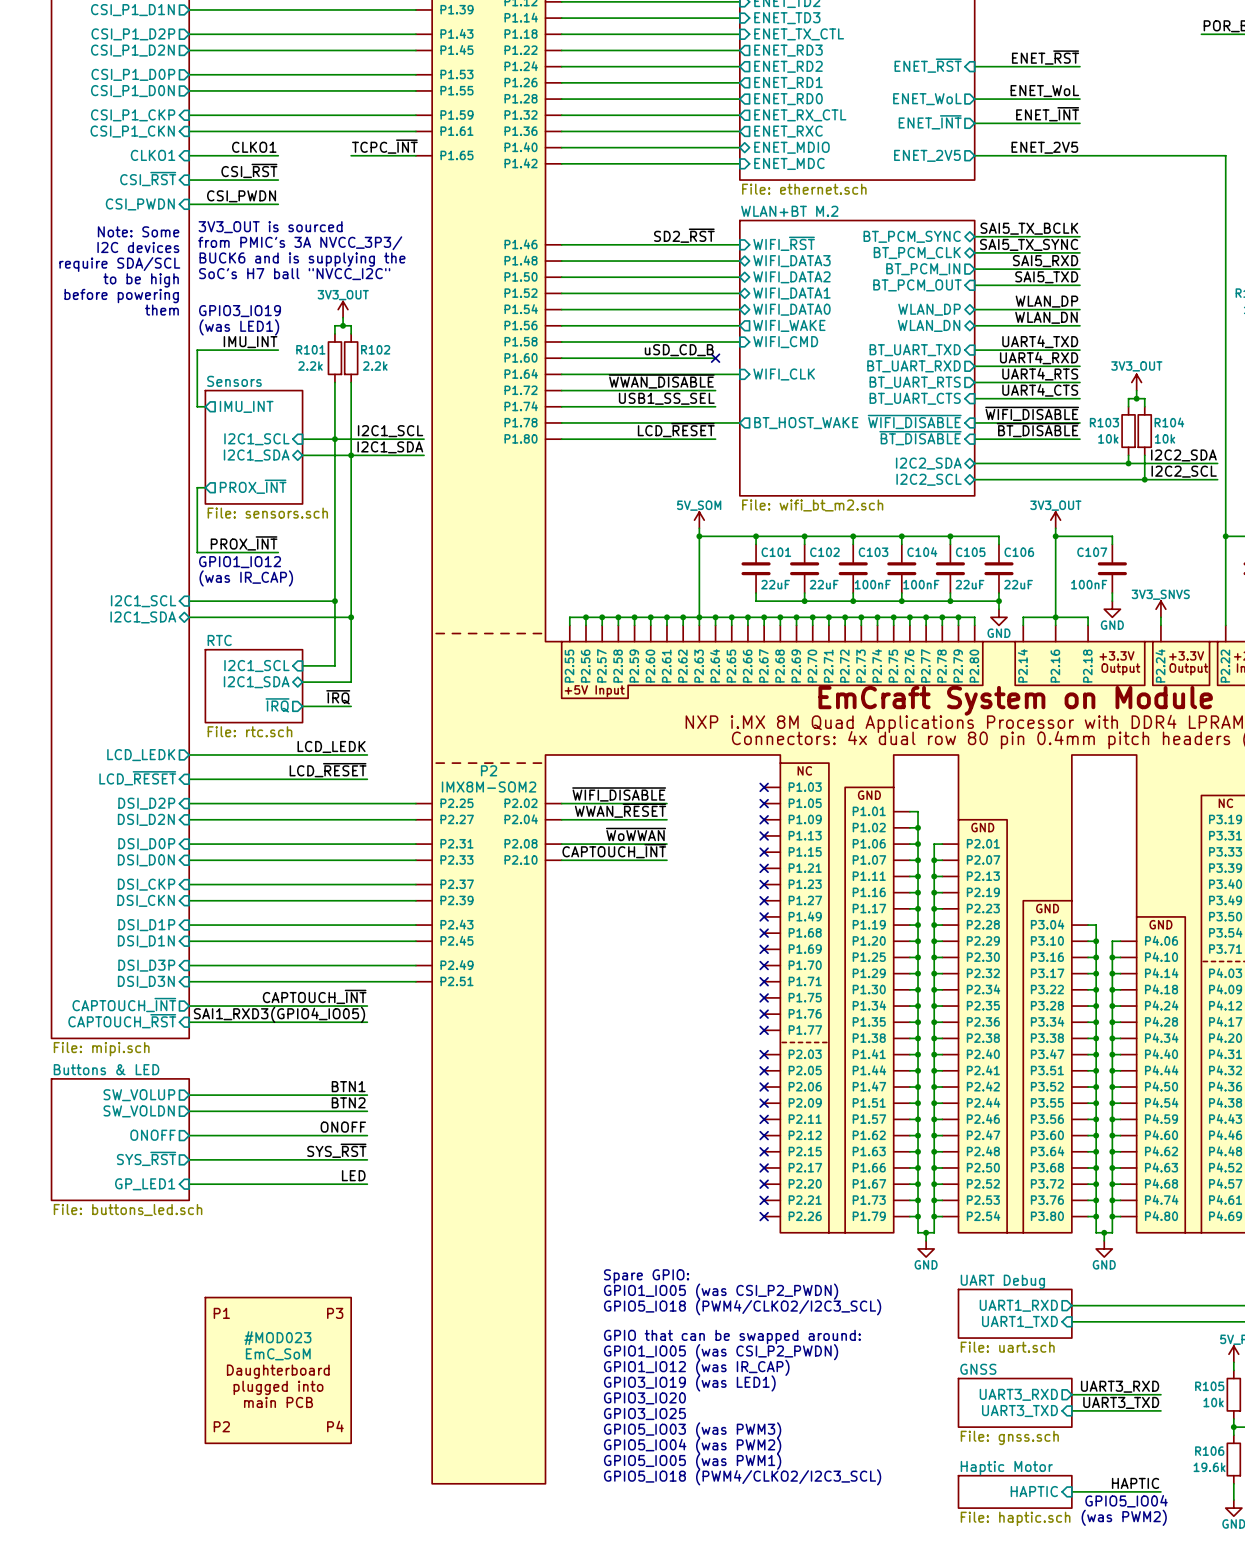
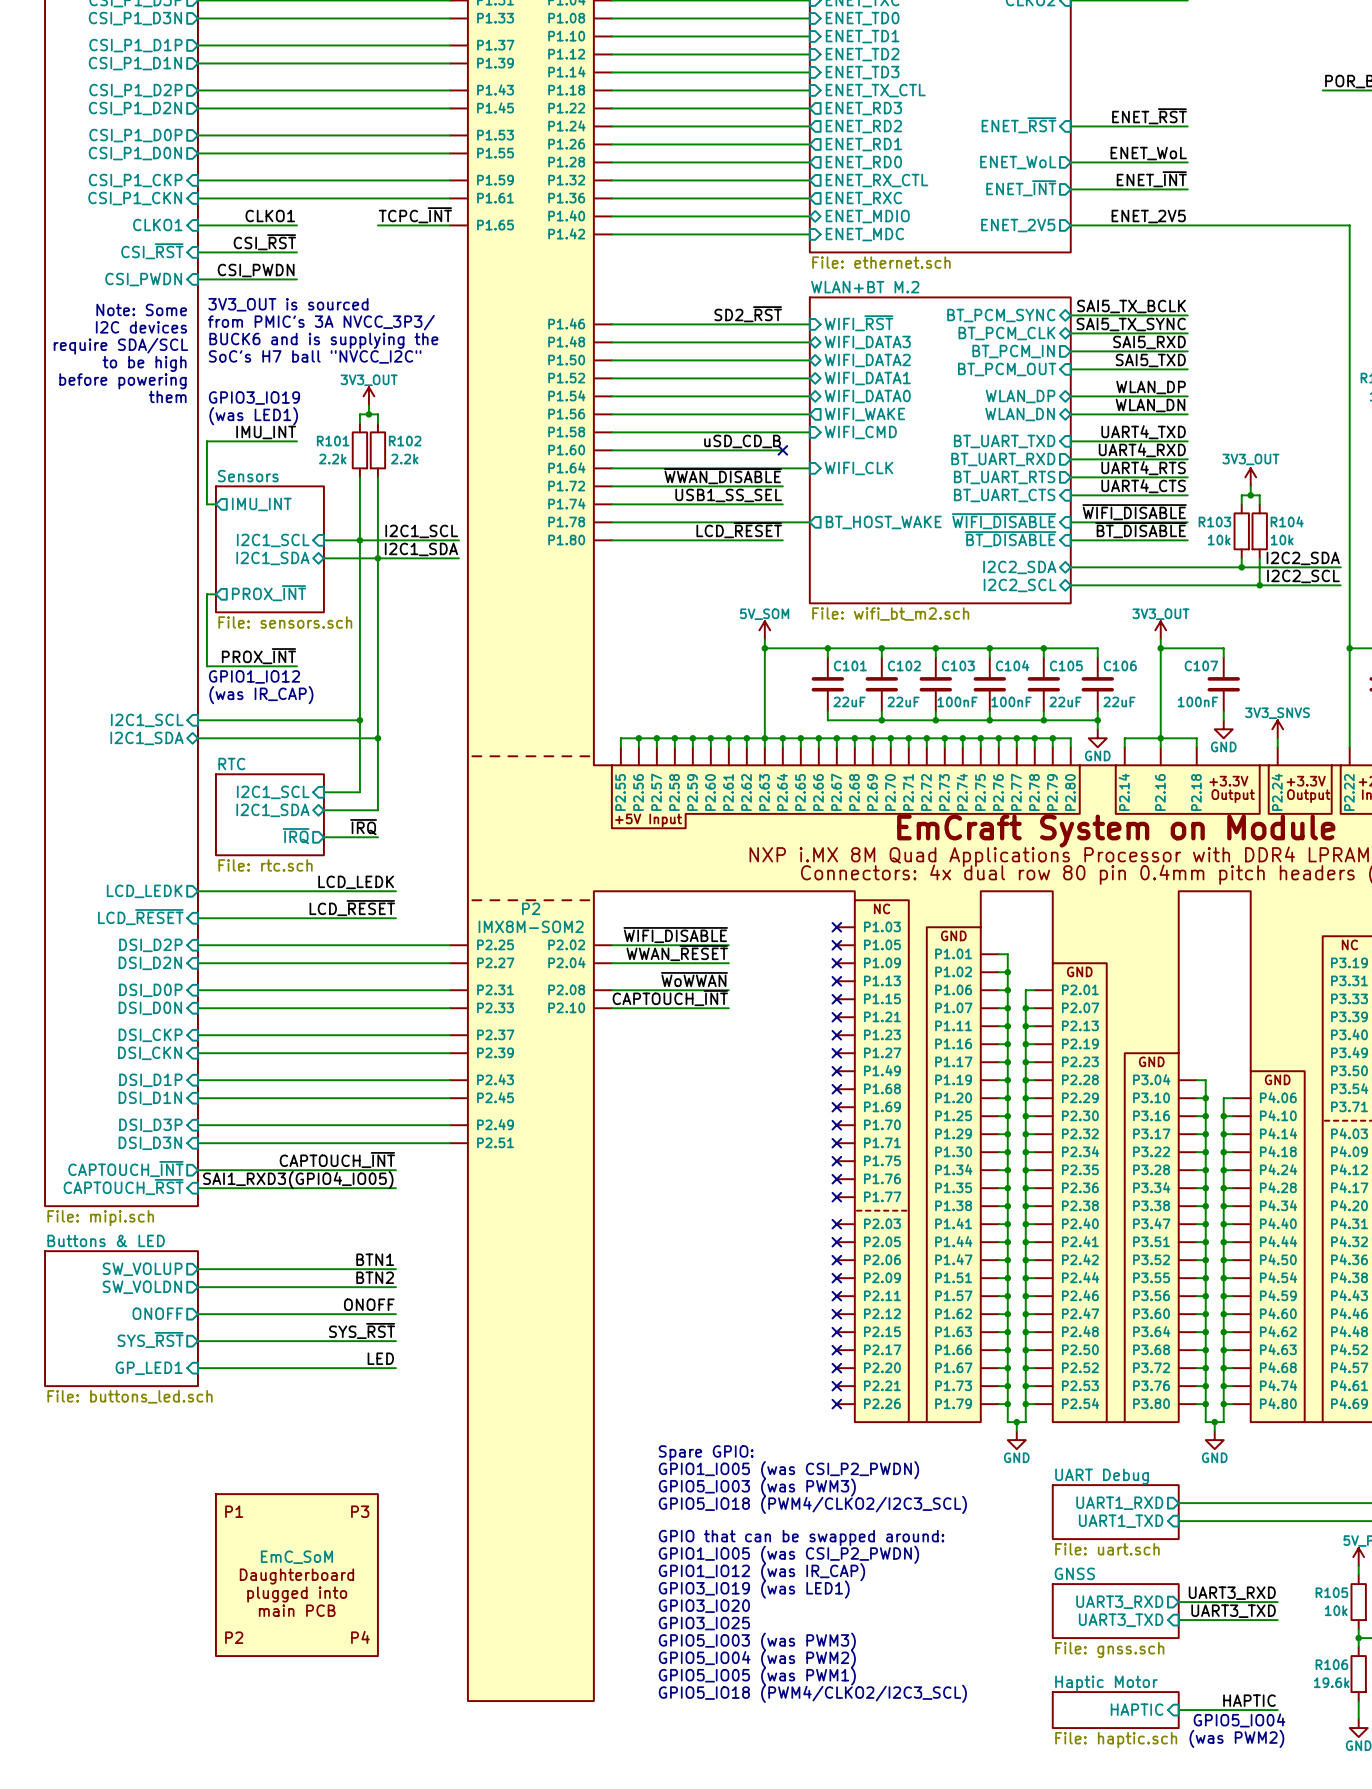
text: none -> Spare GPIO: (706, 1453)
text: Spare GPIO: (646, 1276) -> GPIO1_IO05 (was CSI_P2_PWDN) (788, 1470)
text: GPIO1_IO05 (was CSI_P2_PWDN) (721, 1291) -> GPIO5_IO03 (was PWM3) (757, 1487)
#MOD023 name: #MOD023 (277, 1338) -> none

